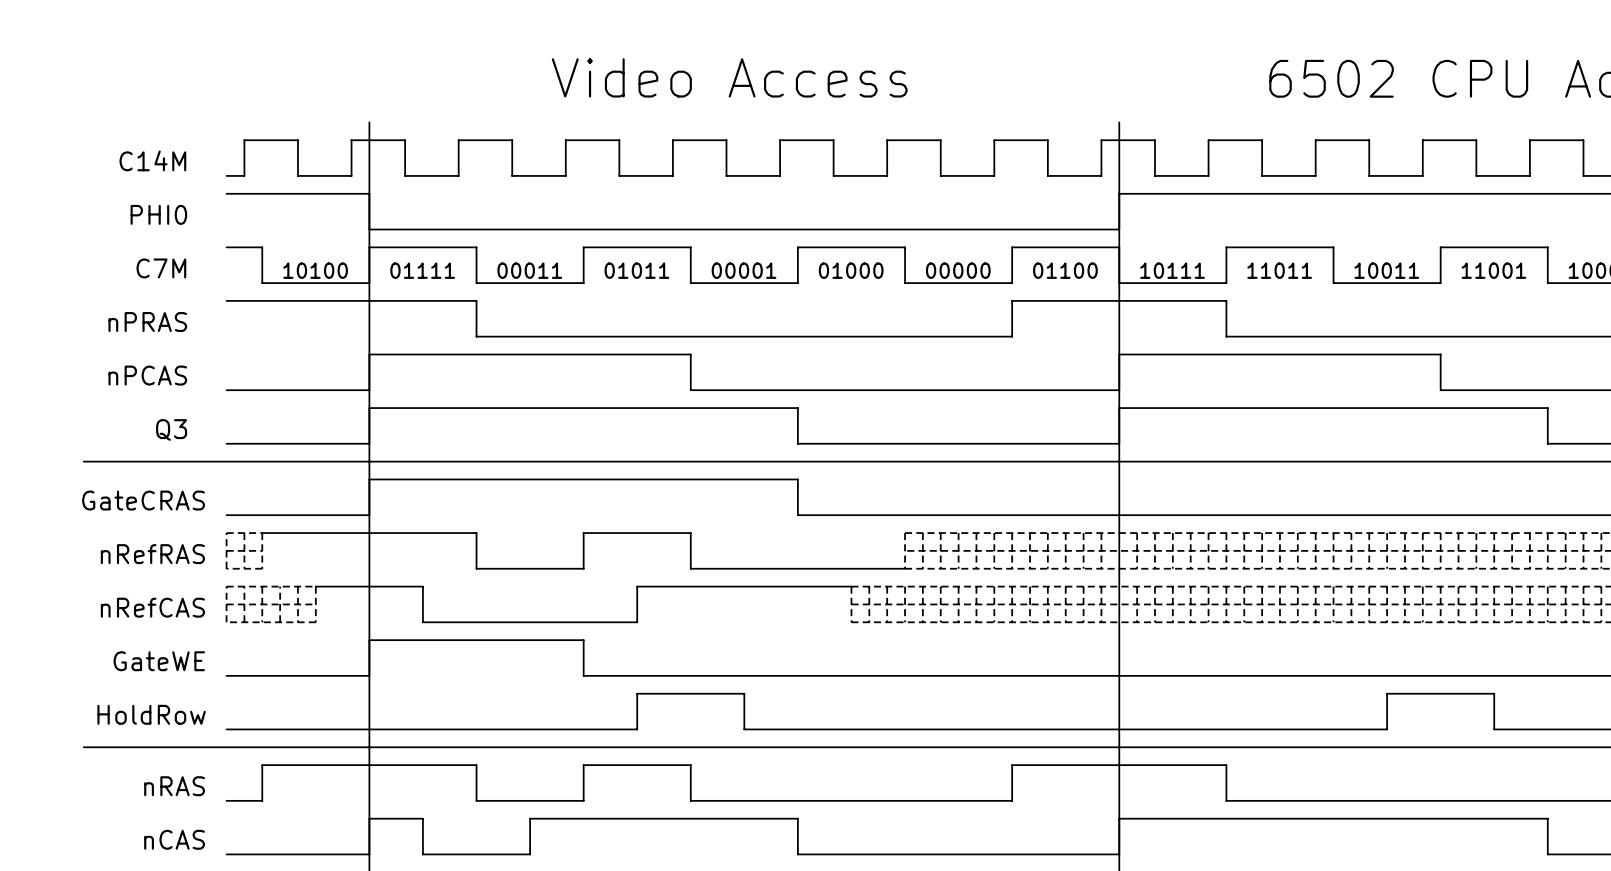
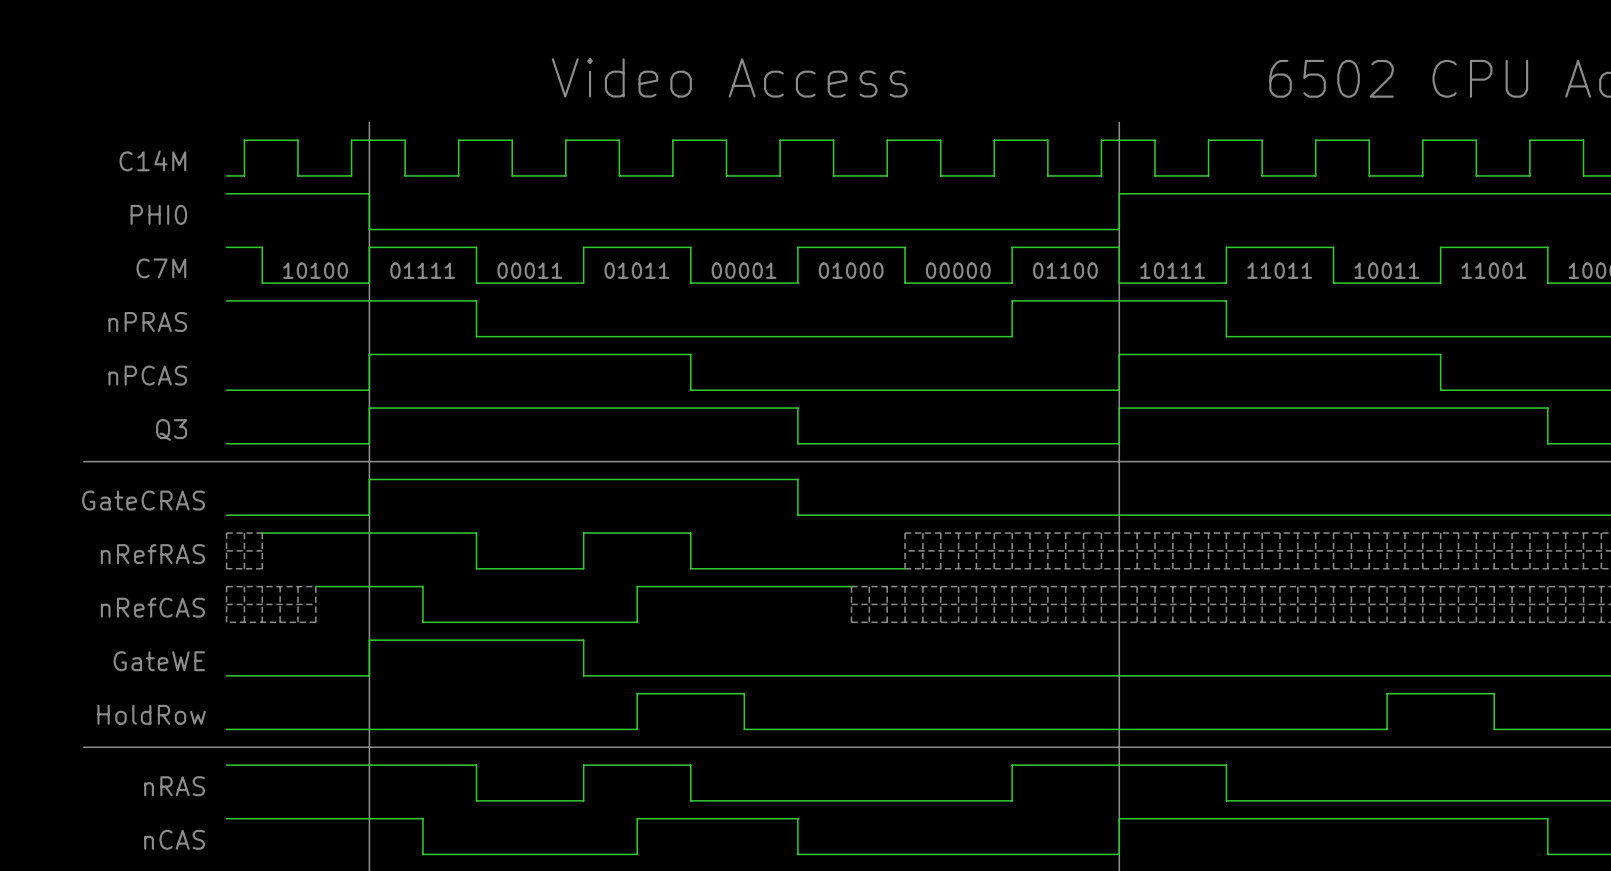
wire: (262, 765) (262, 800) (226, 800) -> (262, 765) (226, 765)
wire: (369, 818) (369, 854) (226, 854) -> (369, 818) (226, 818)
wire: (637, 818) (530, 818) (530, 854) -> (637, 818) (637, 854) (530, 854)

